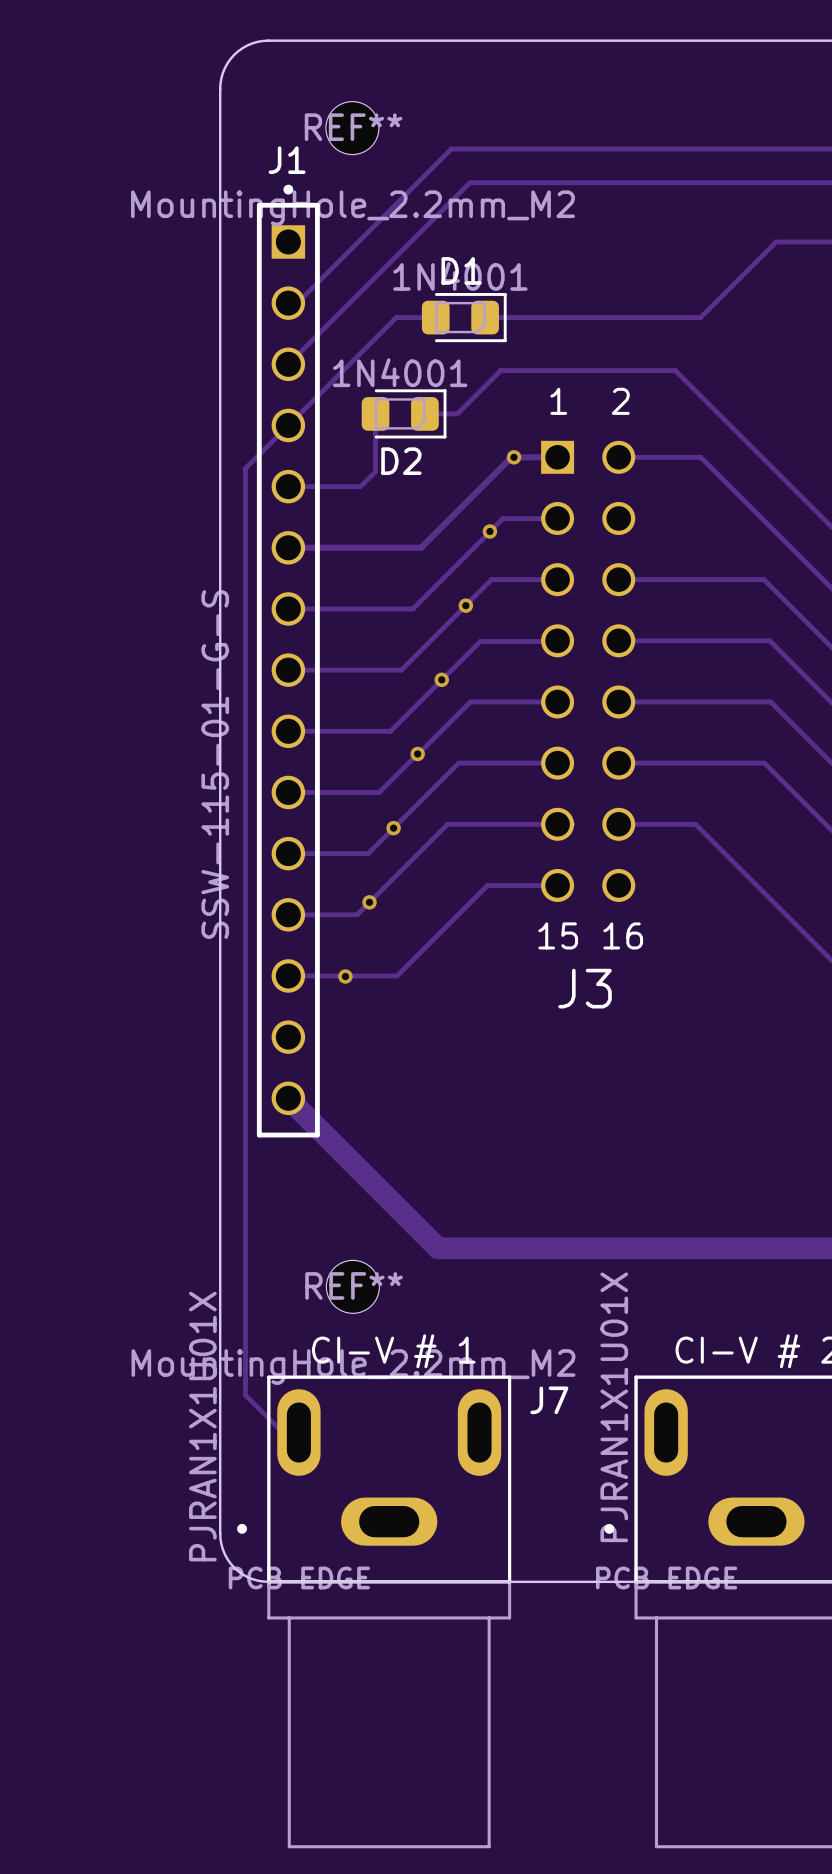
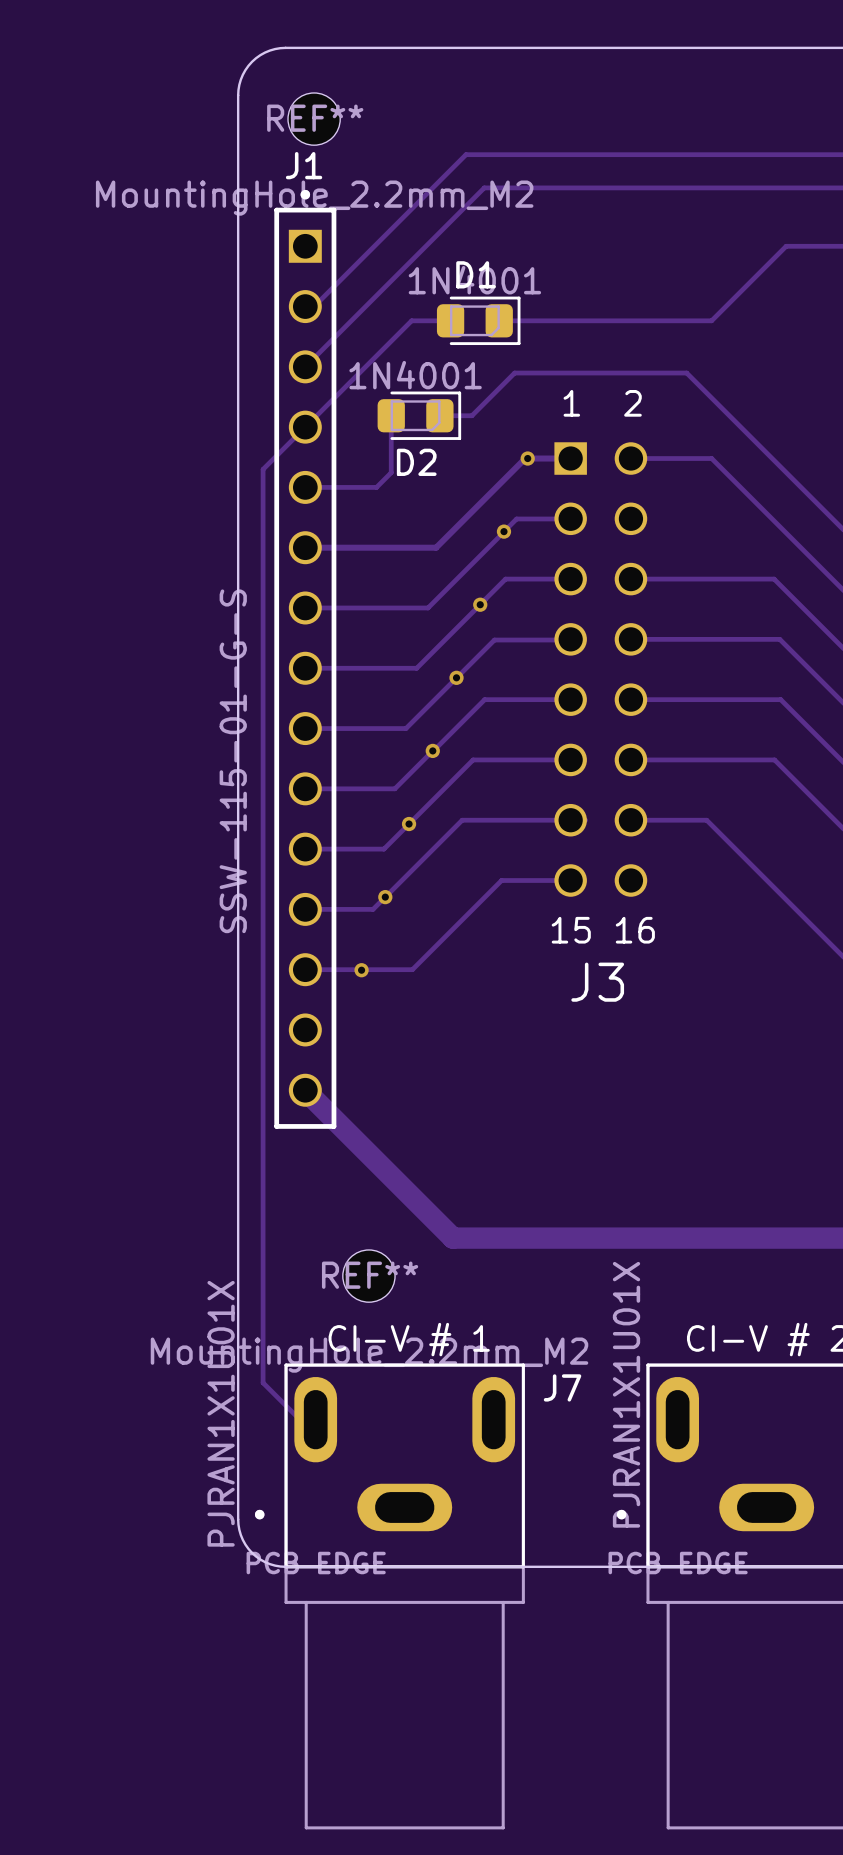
REF** position: (352, 128) -> (314, 119)

